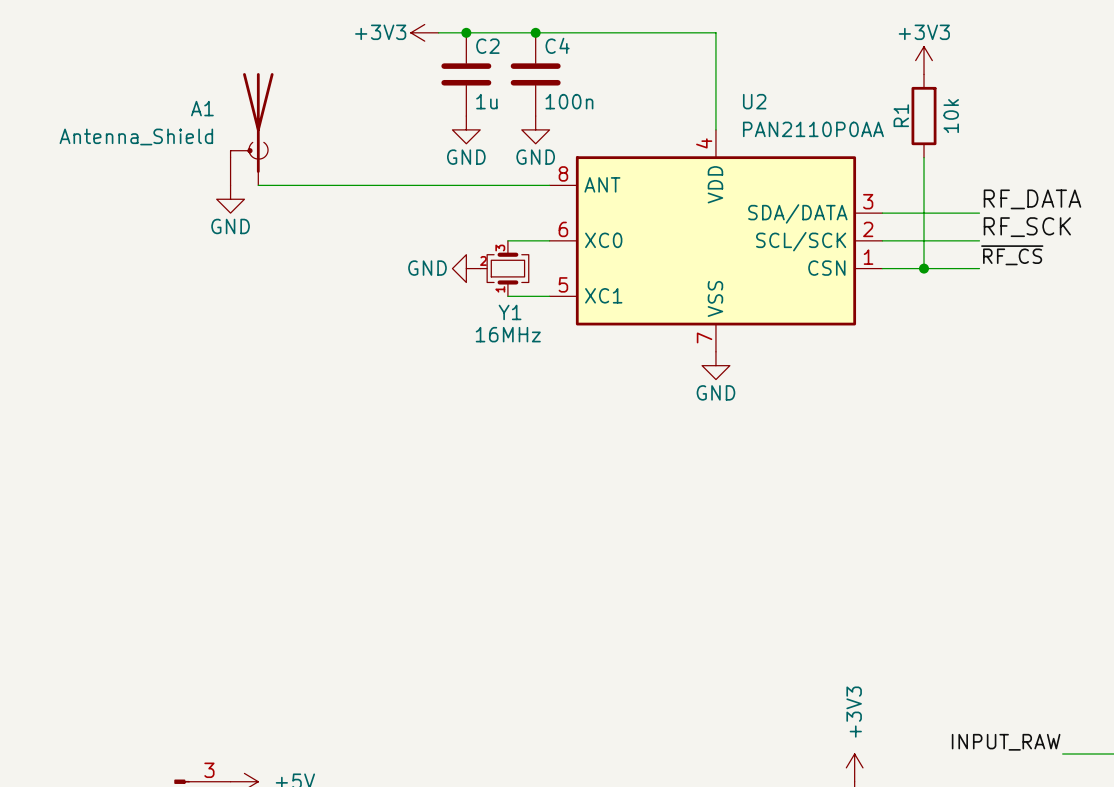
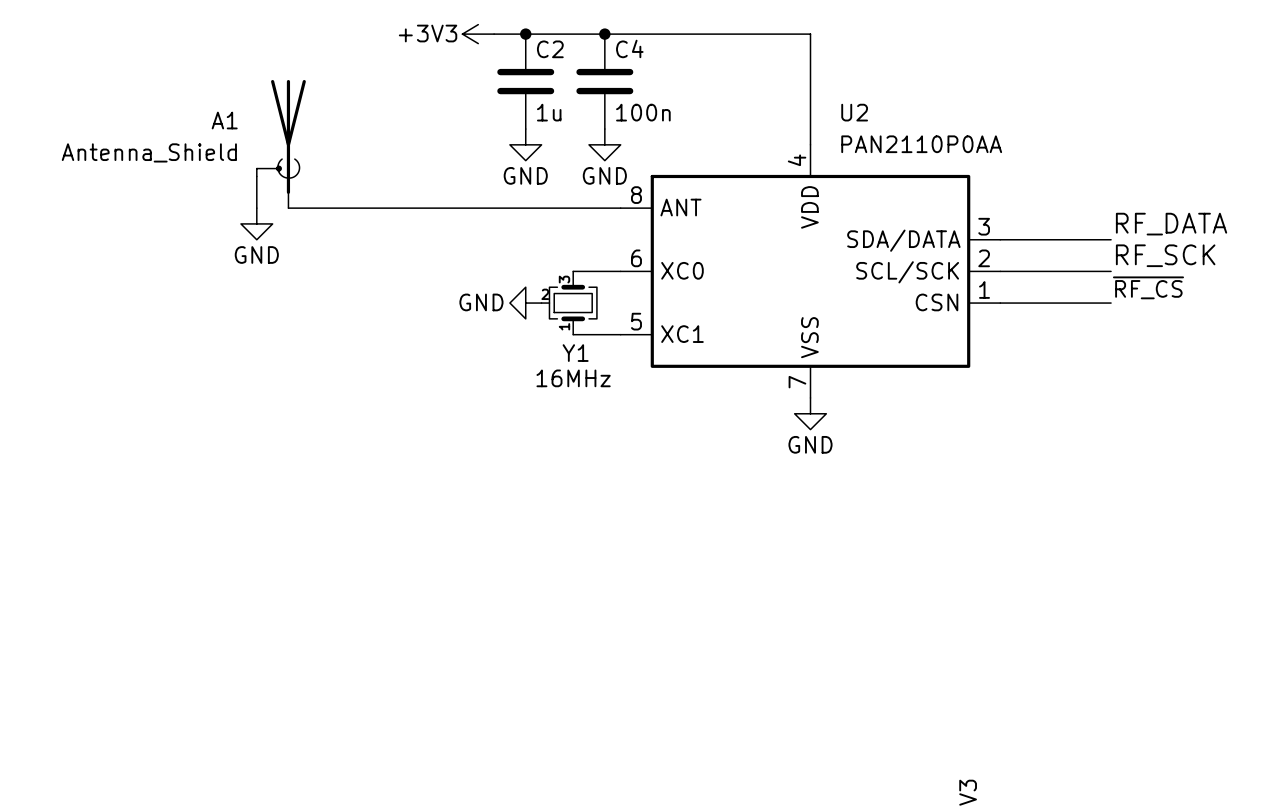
power symbol: +3V3 (924, 60) -> none
R1: 10k (924, 116) -> none
wire: (924, 157) (924, 268) -> none
junction: (924, 268) -> none

